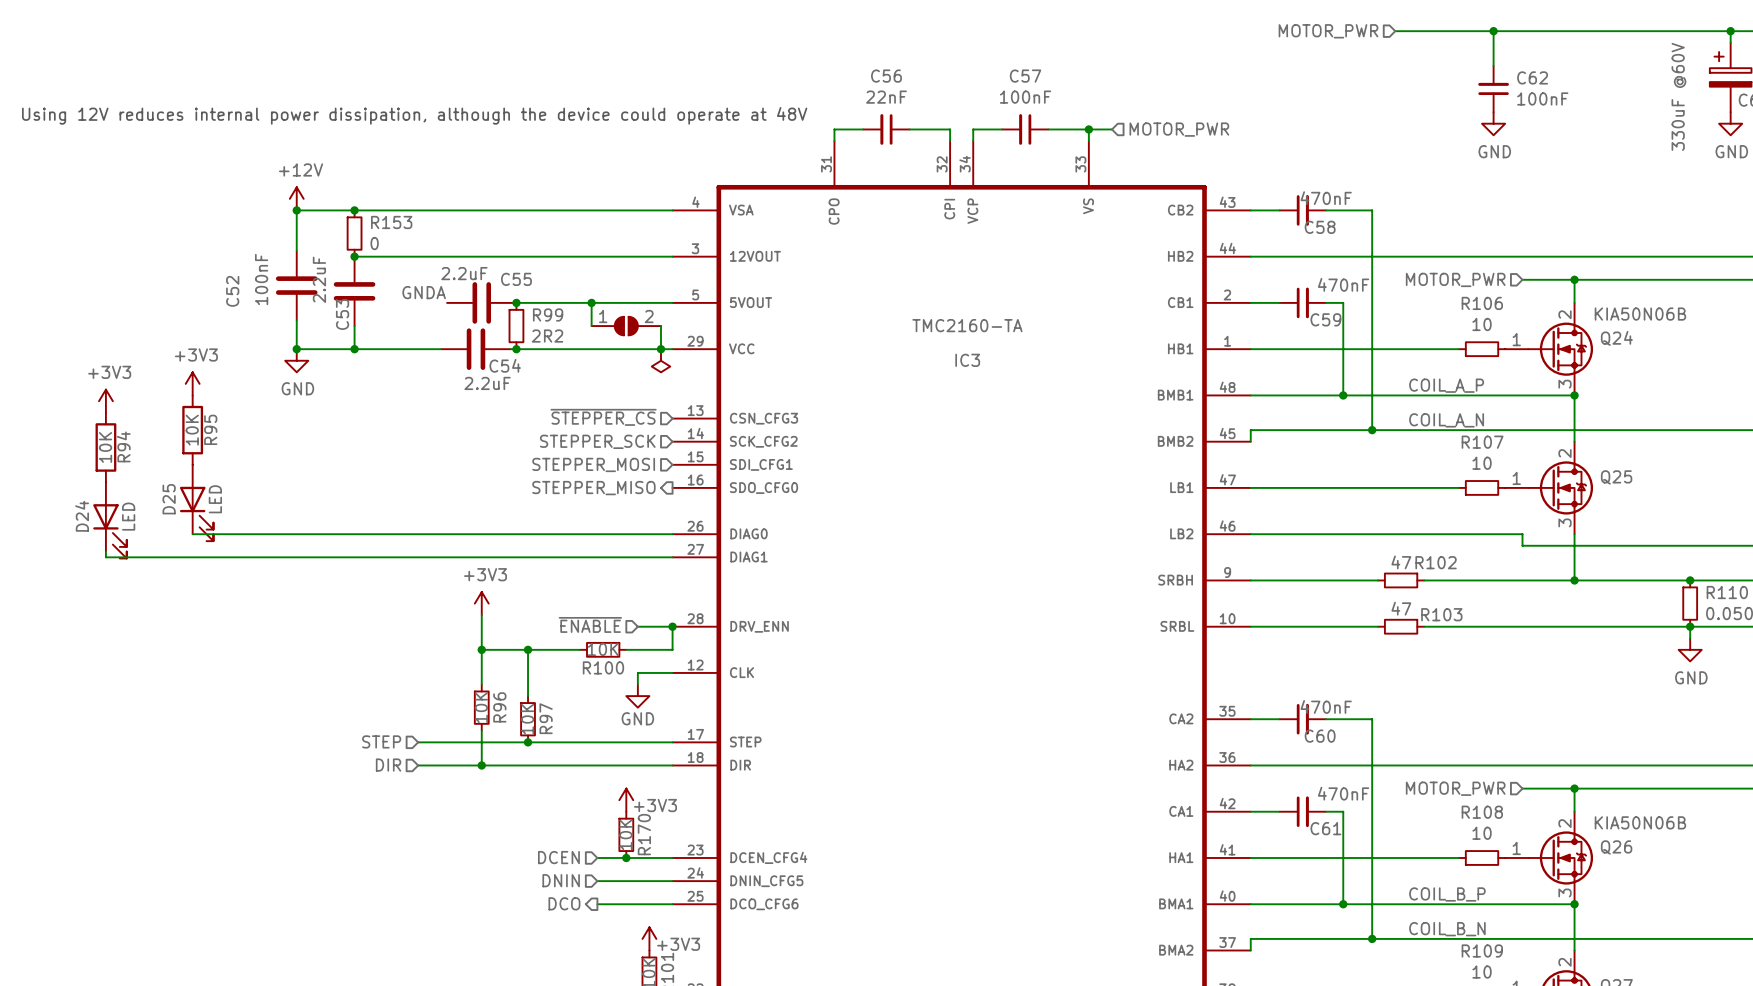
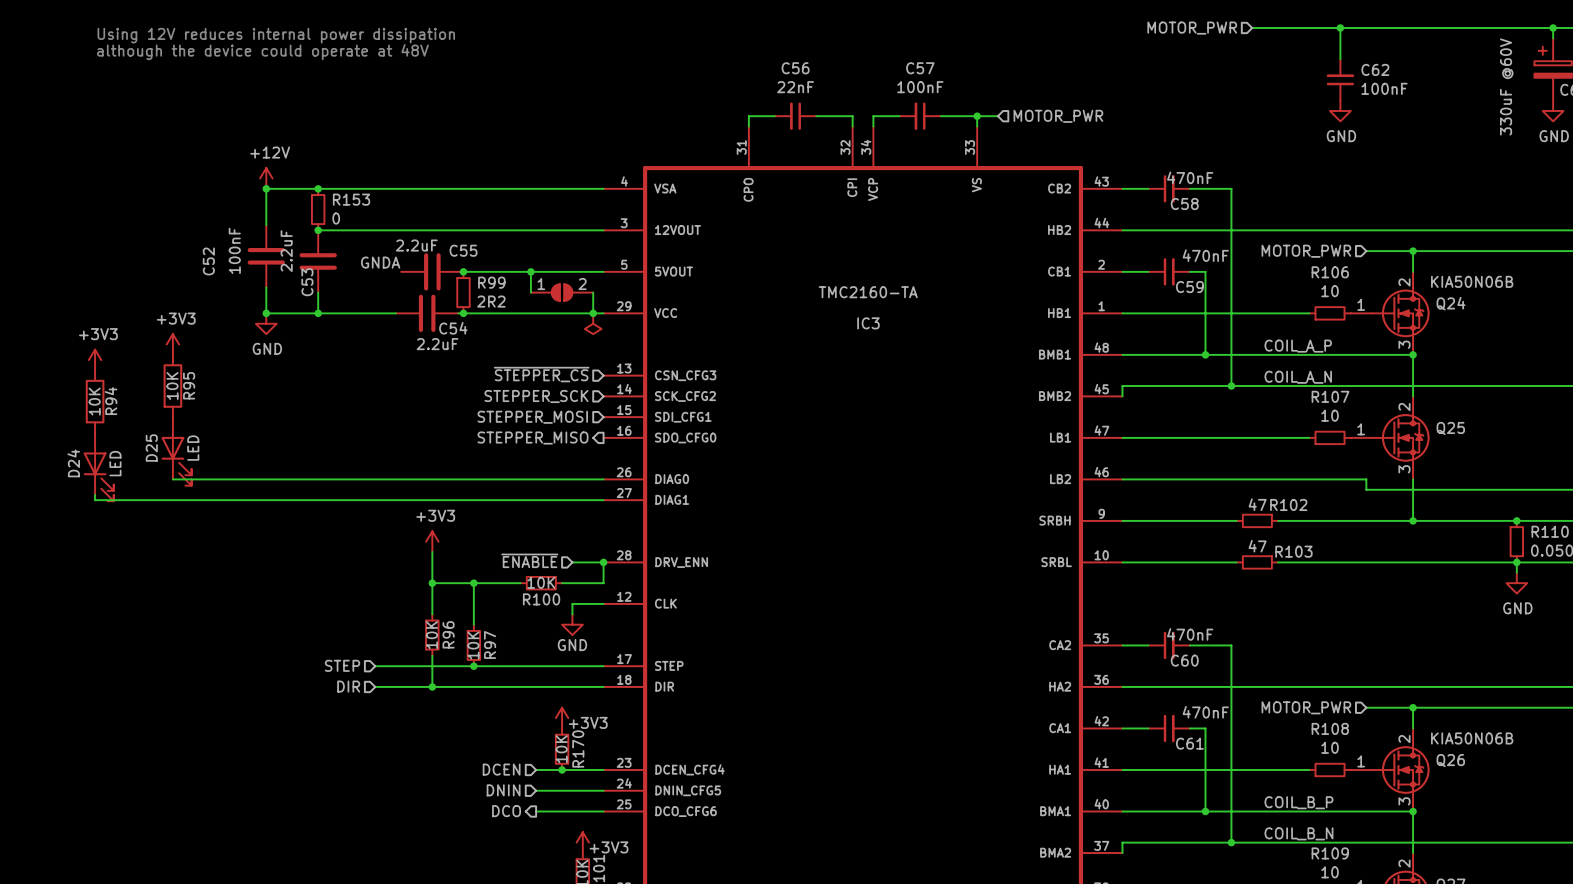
text: none -> Using 12V reduces internal power dissipation (276, 35)
text: none -> although the device could operate at 48V (262, 52)
text: Using 12V reduces internal power dissipation, although the device could operate at 48V (414, 115) -> none

